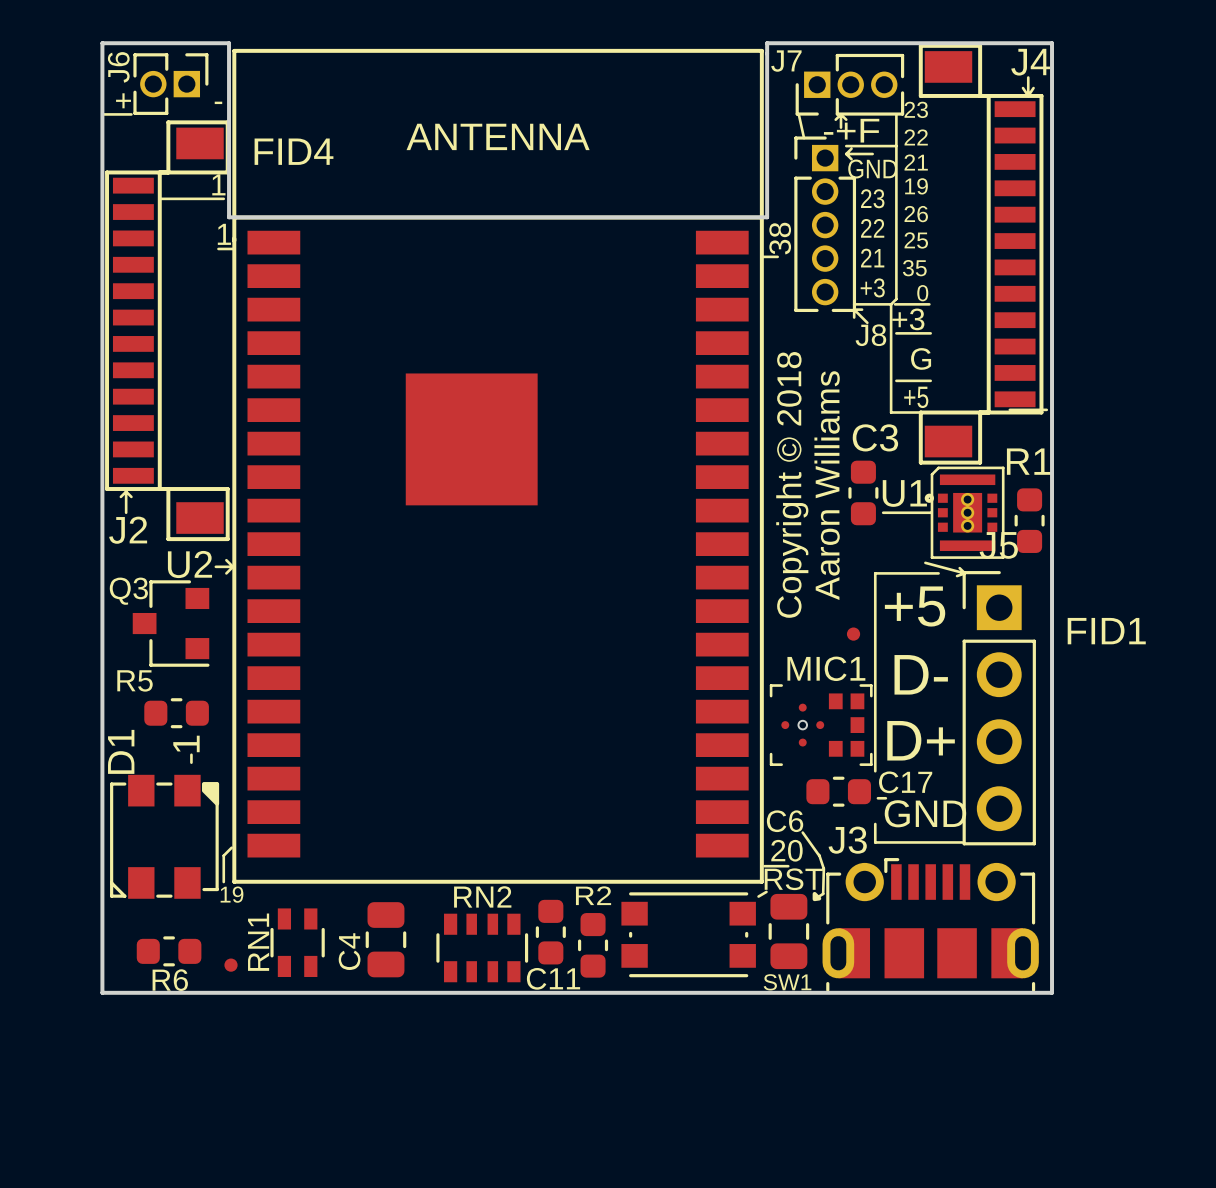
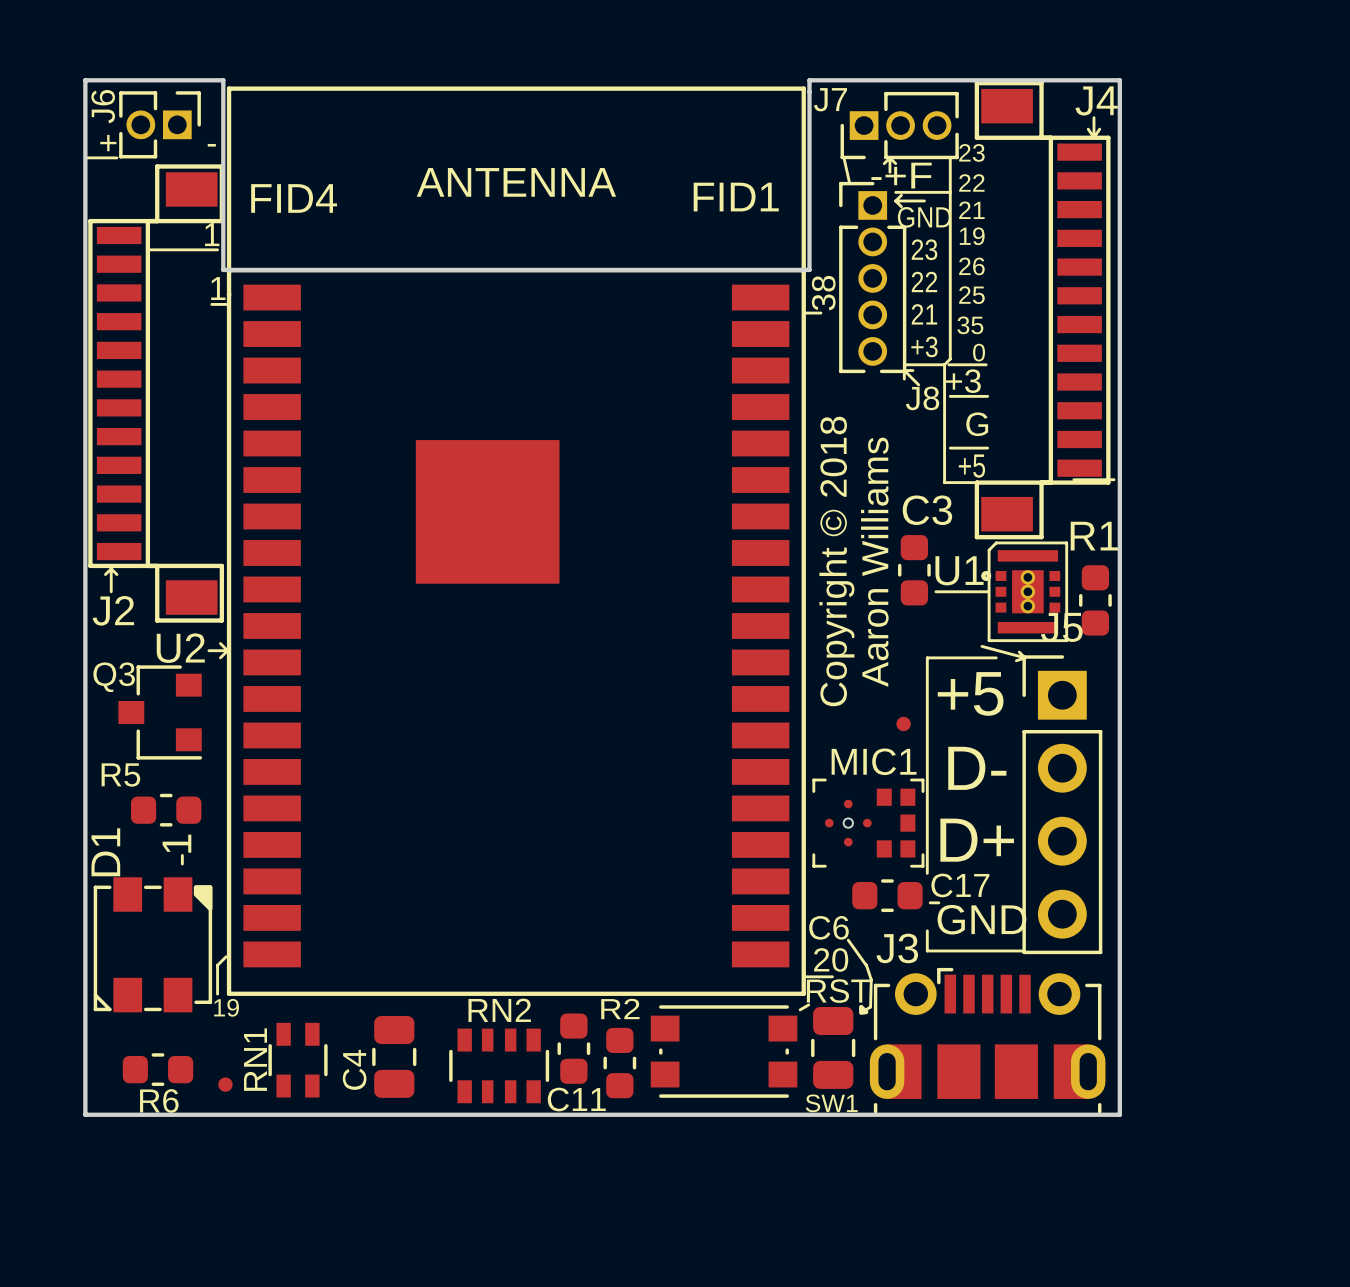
FID1 name position: FID1 (1106, 631) -> FID1 (736, 197)

